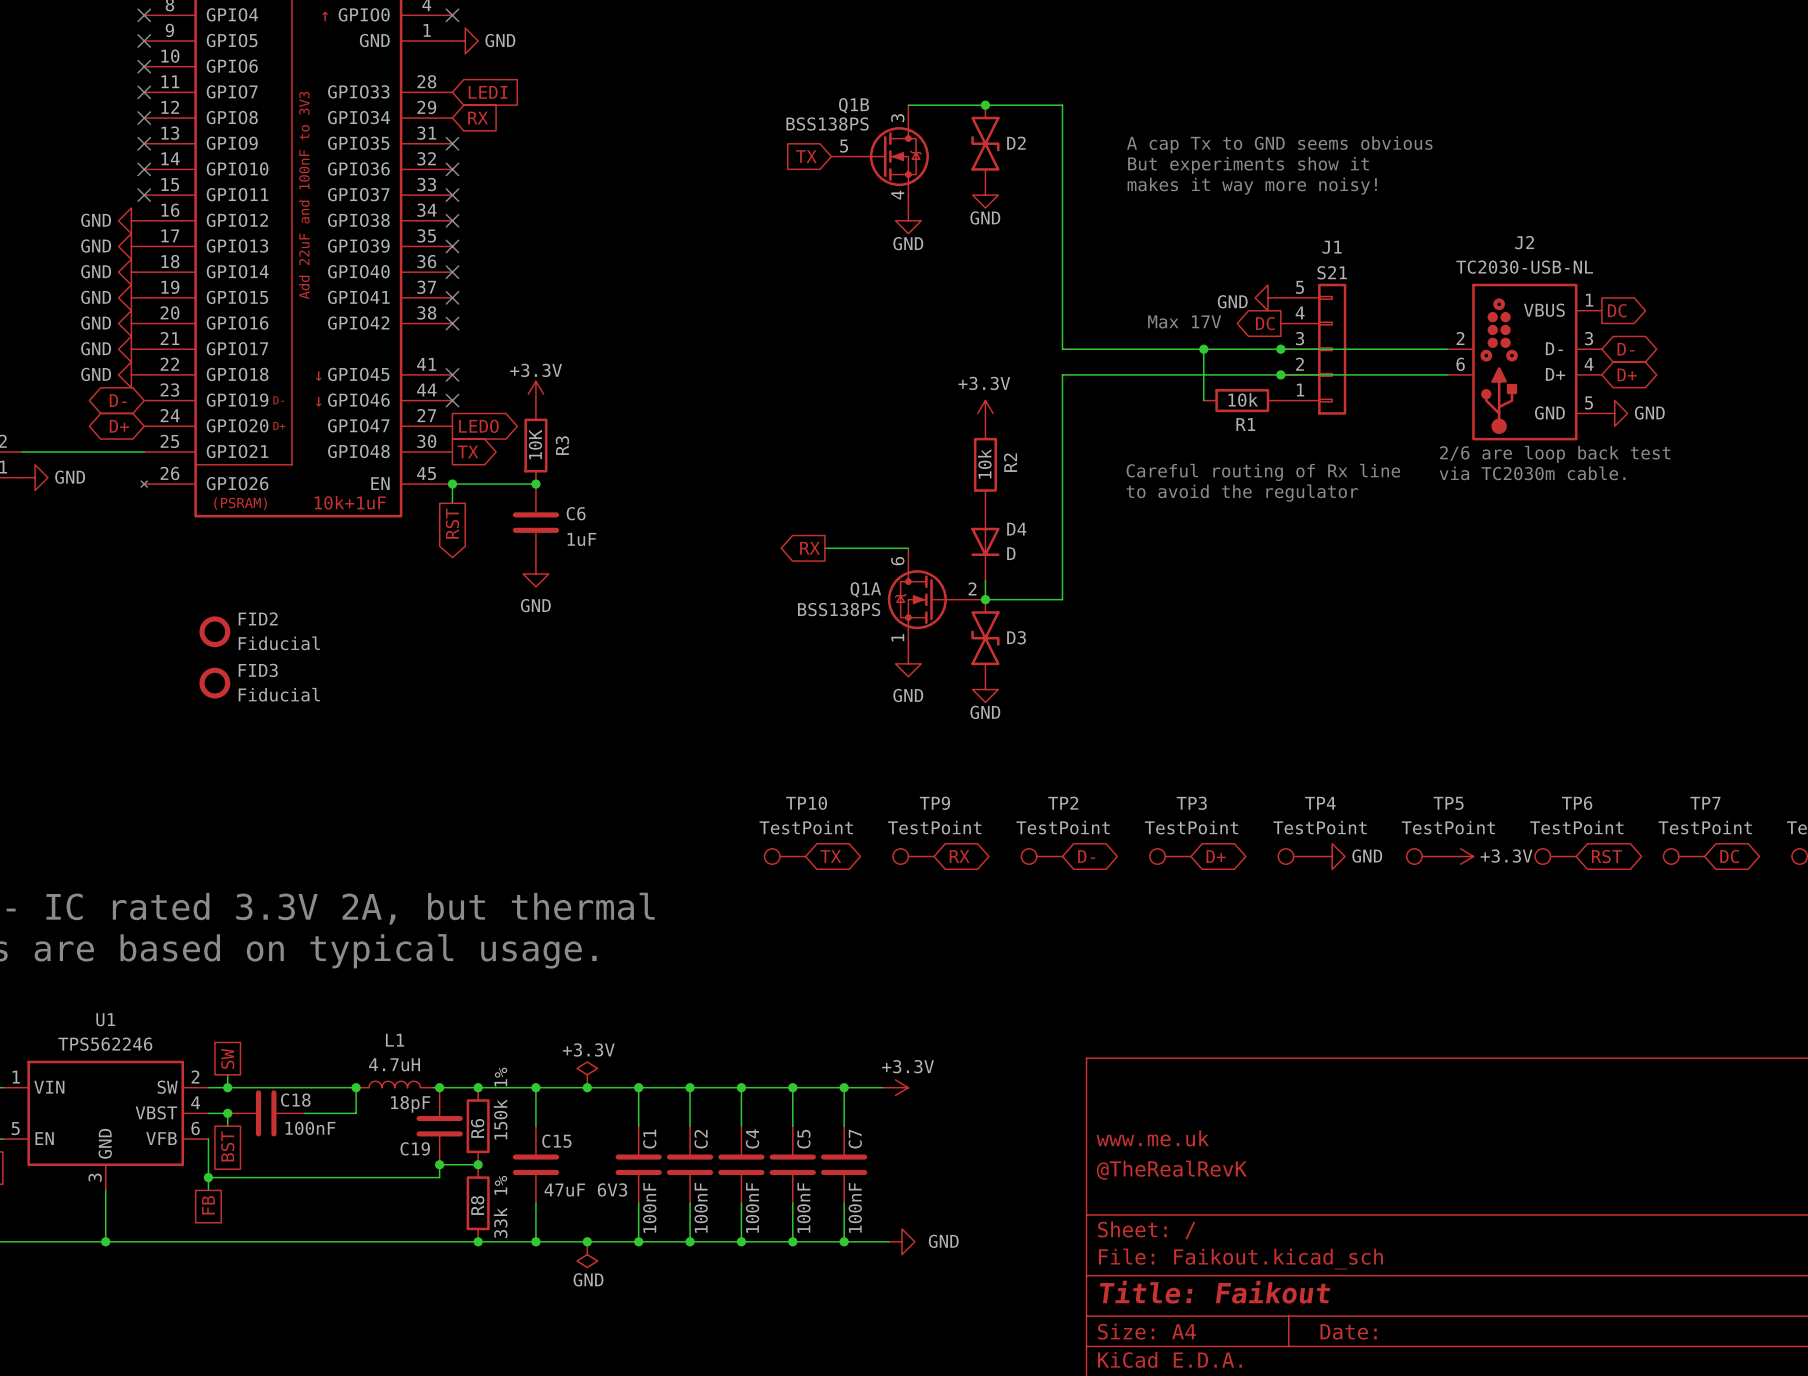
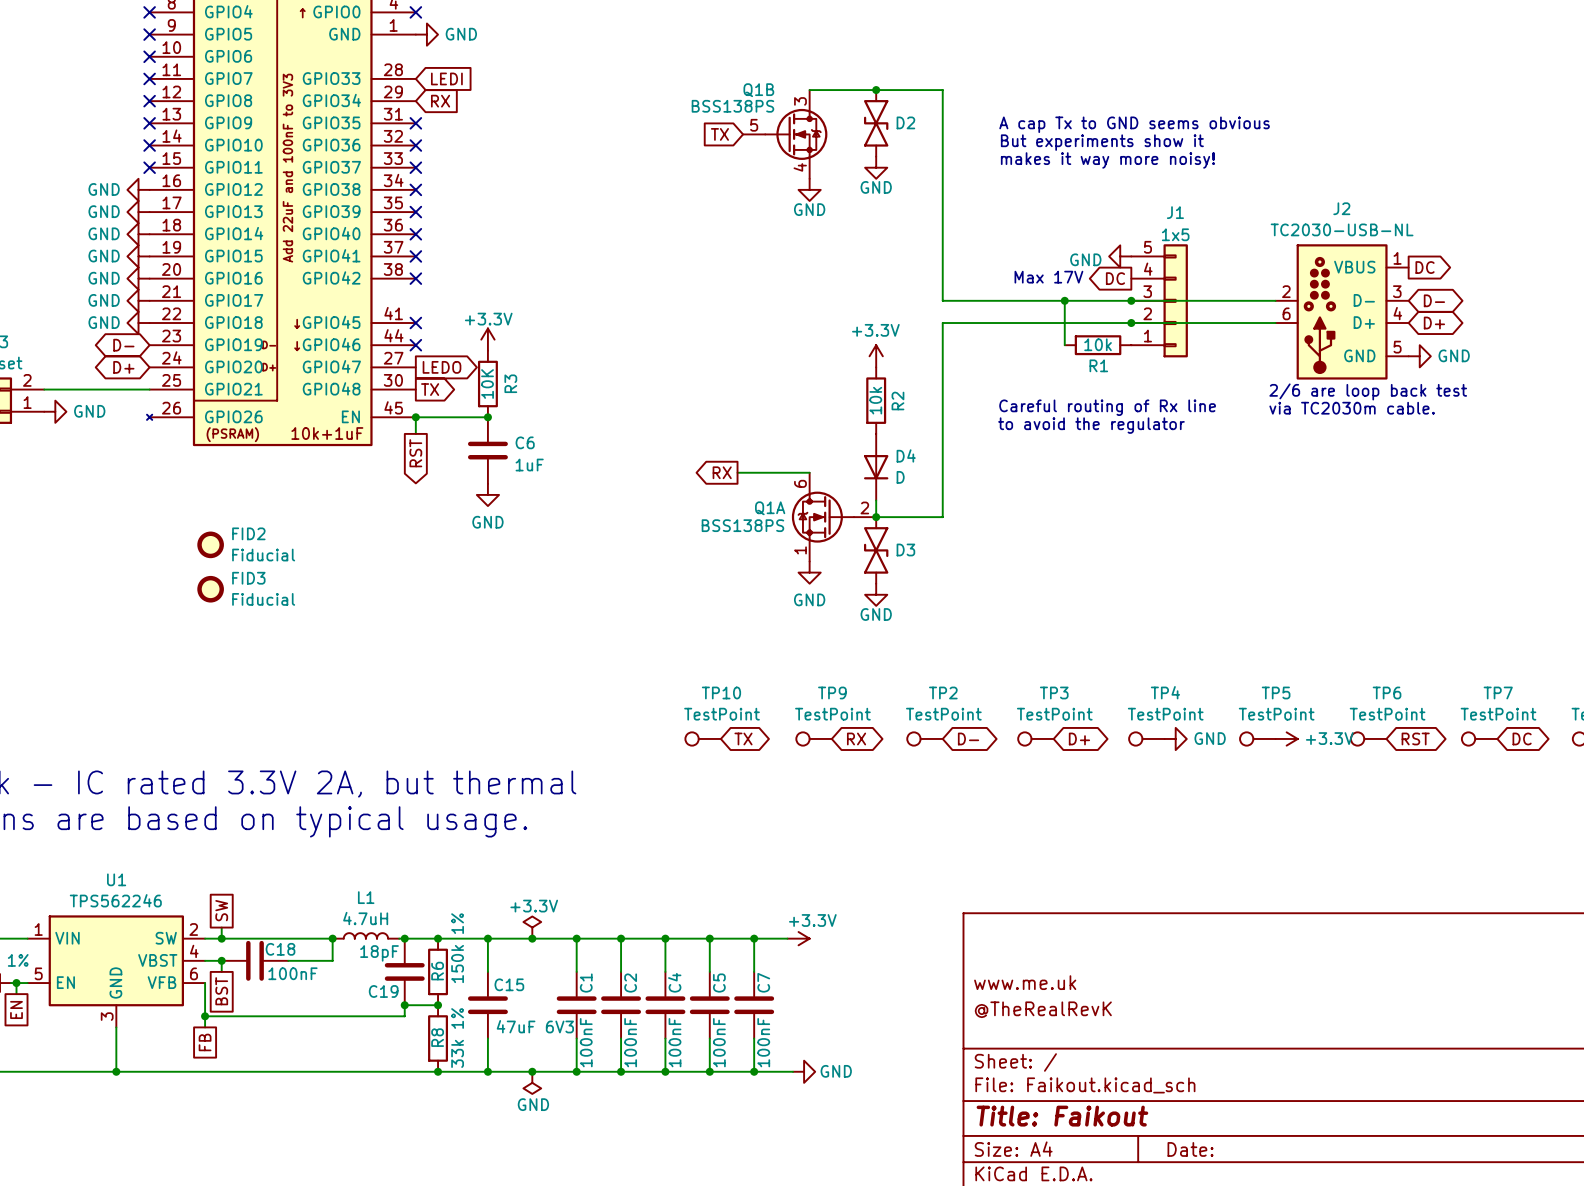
J1 value: S21 (1332, 272) -> 1x5 (1175, 234)

